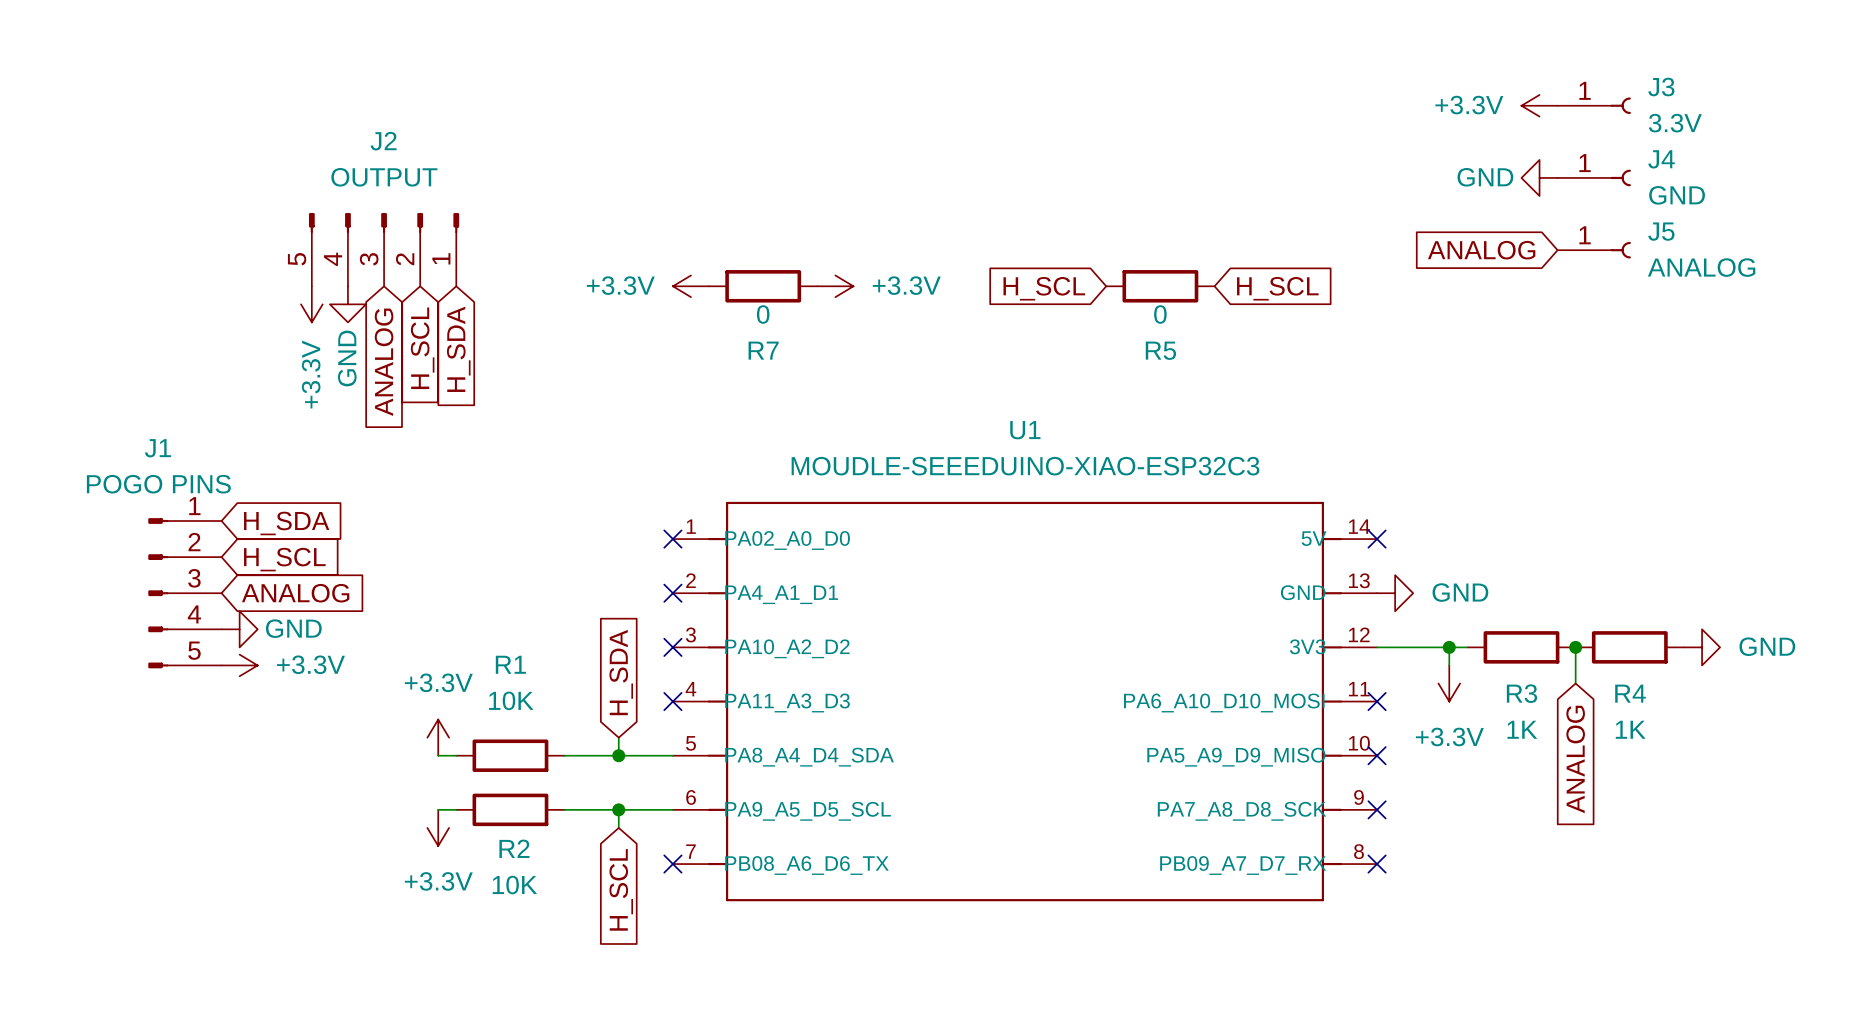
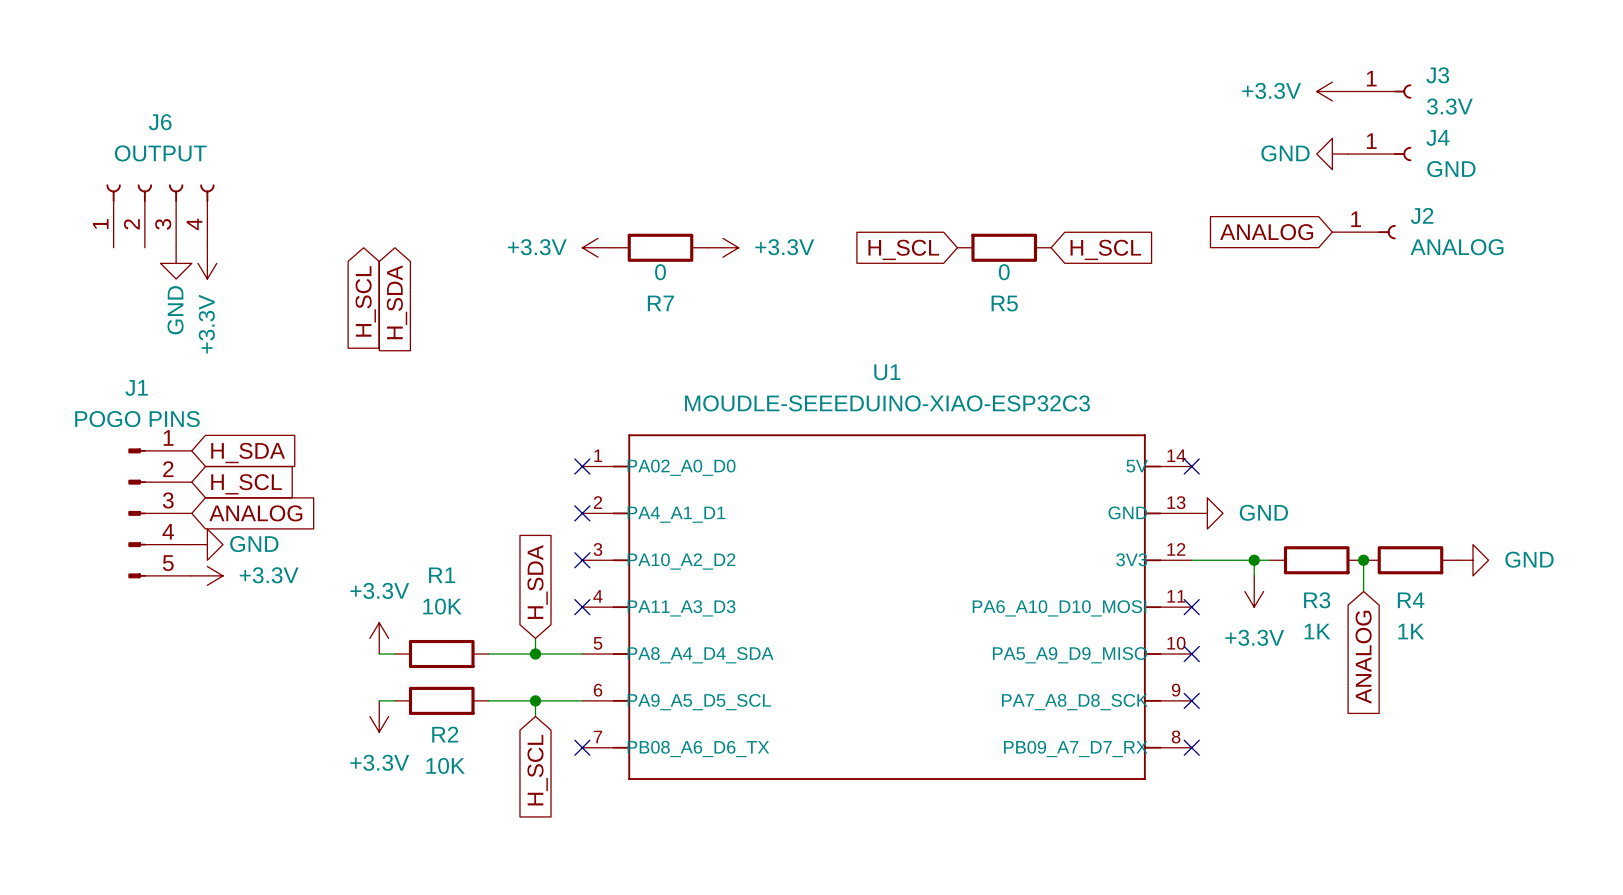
J2 name position: J2 (383, 141) -> J2 (1422, 215)
J2 value: OUTPUT (384, 177) -> ANALOG (1456, 247)
J2 symbol: [308, 212, 460, 287] -> [1332, 224, 1396, 240]
J6: none -> OUTPUT (160, 216)
global label position: ANALOG (1481, 250) -> ANALOG (1266, 232)
J5: ANALOG (1594, 250) -> none
power symbol position: +3.3V (311, 304) -> +3.3V (207, 263)
power symbol position: GND (347, 304) -> GND (176, 263)
global label: ANALOG (384, 362) -> none

